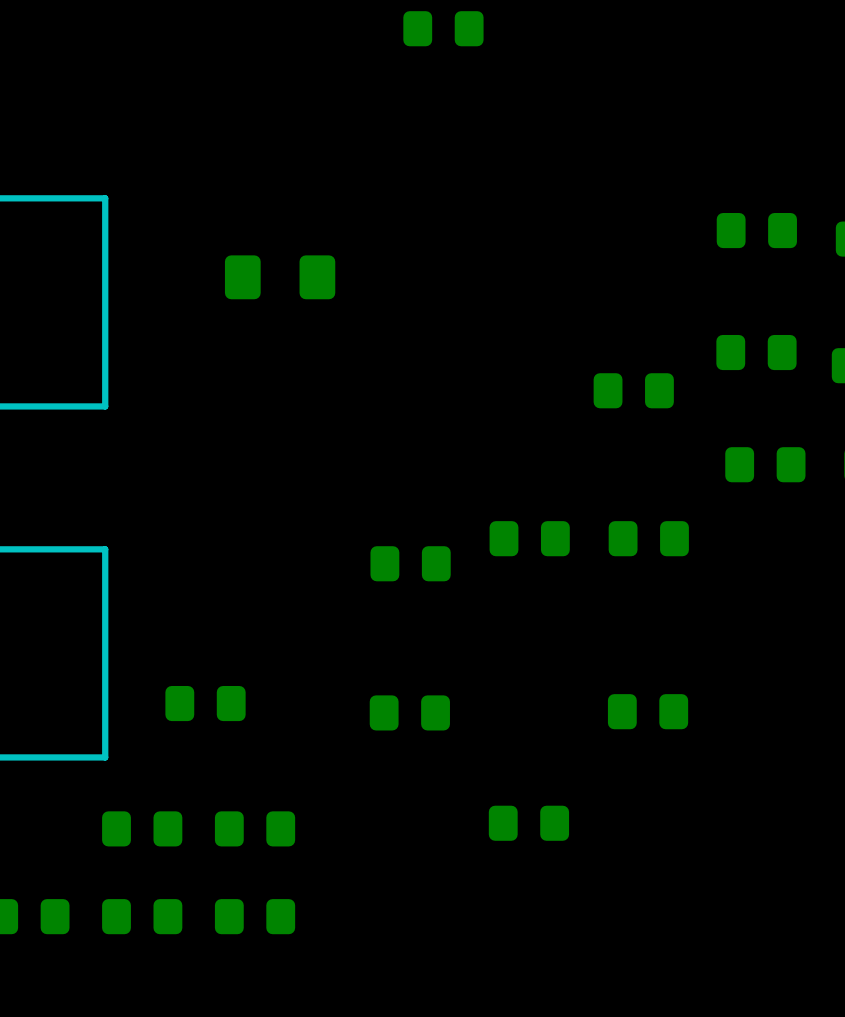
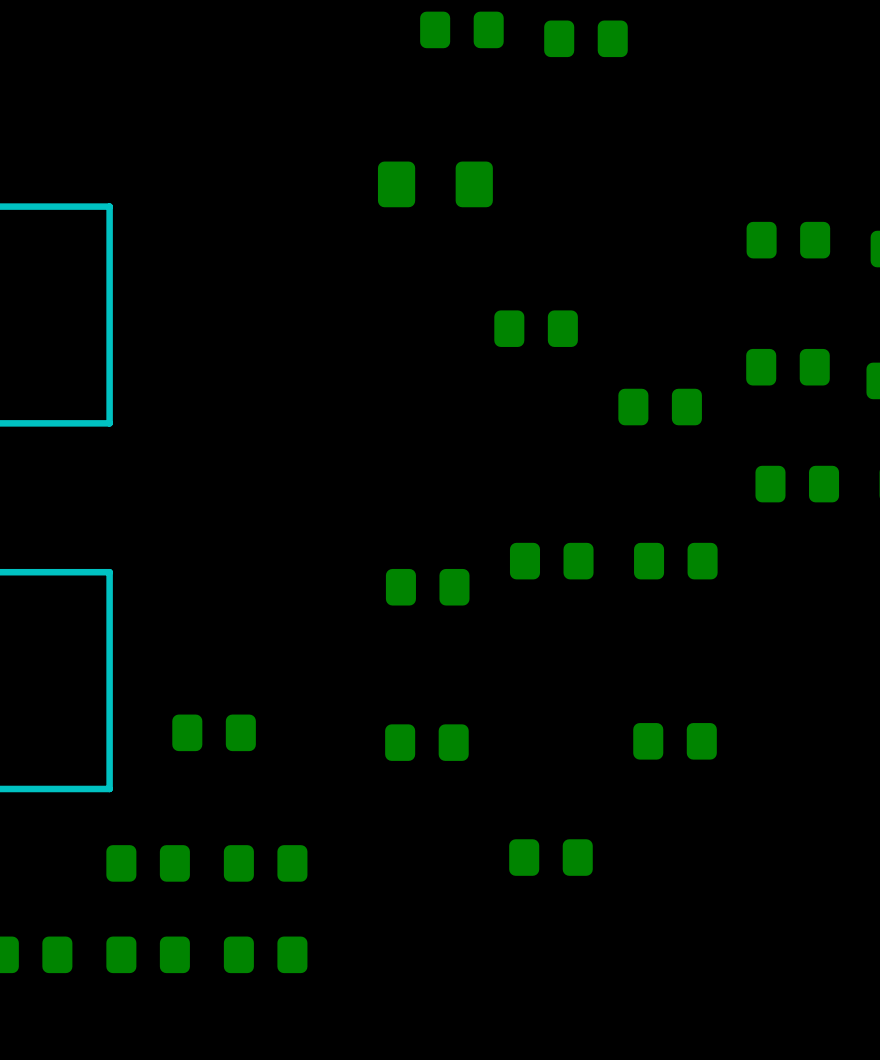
part: none -> (585, 38)
part position: (280, 277) -> (435, 184)
part: none -> (536, 328)

